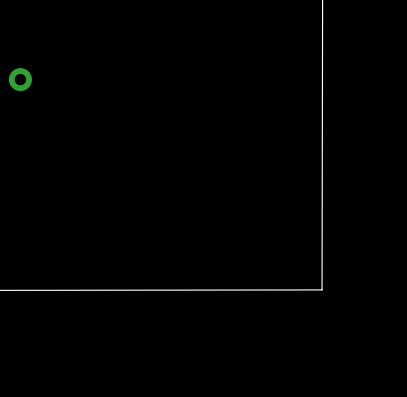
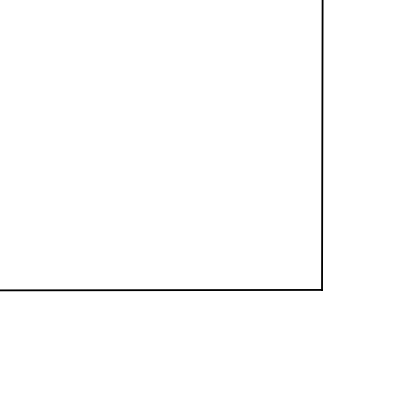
via: (20, 79) -> none

